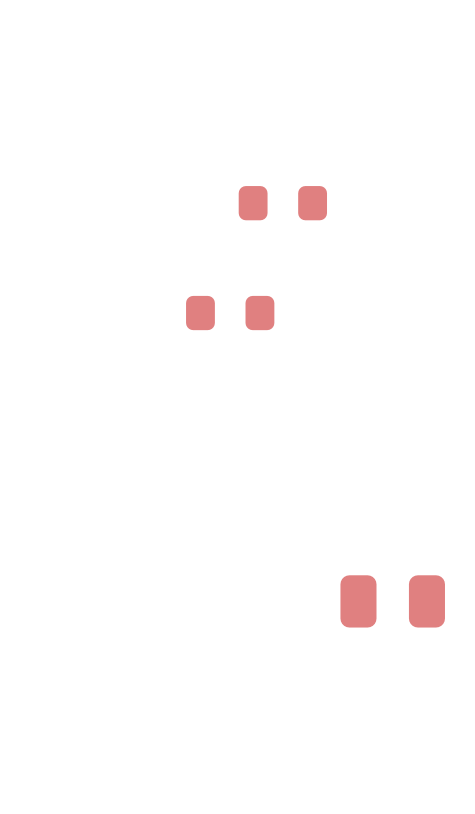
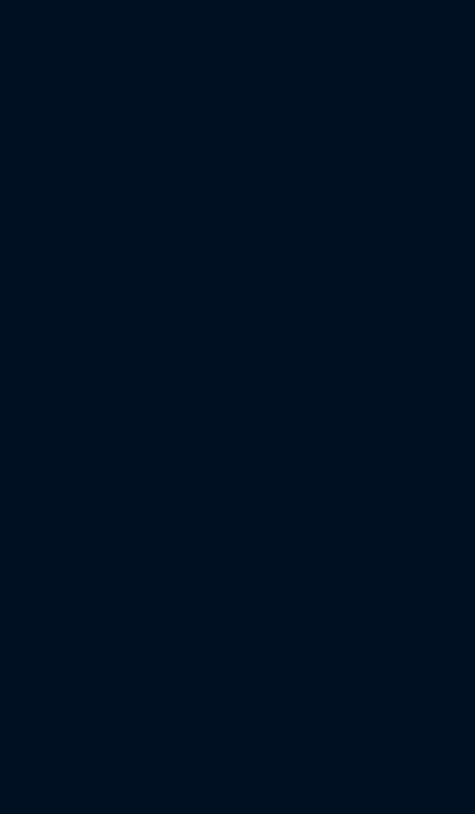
part: (282, 203) -> none
part: (230, 313) -> none
part: (392, 601) -> none

